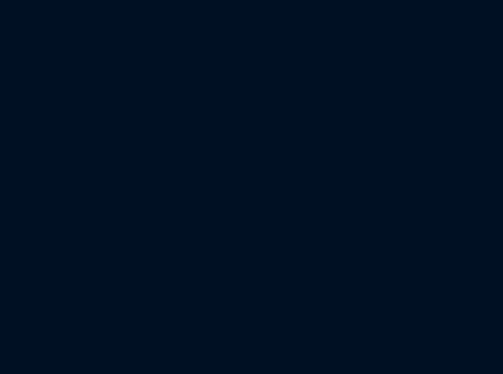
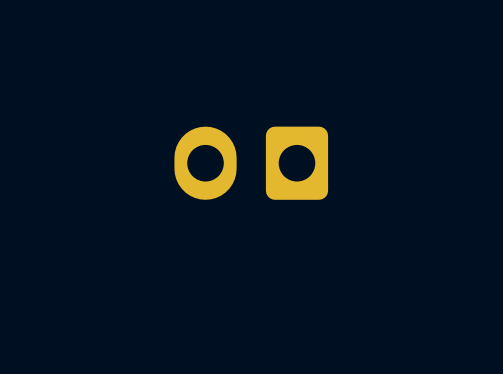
part: none -> (251, 163)

